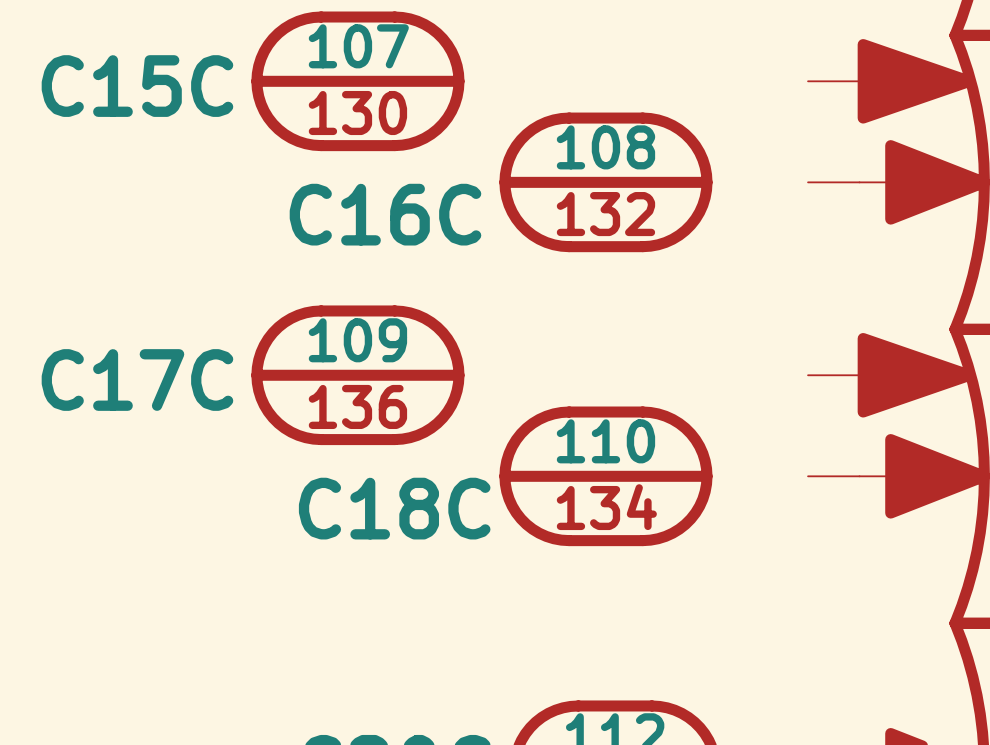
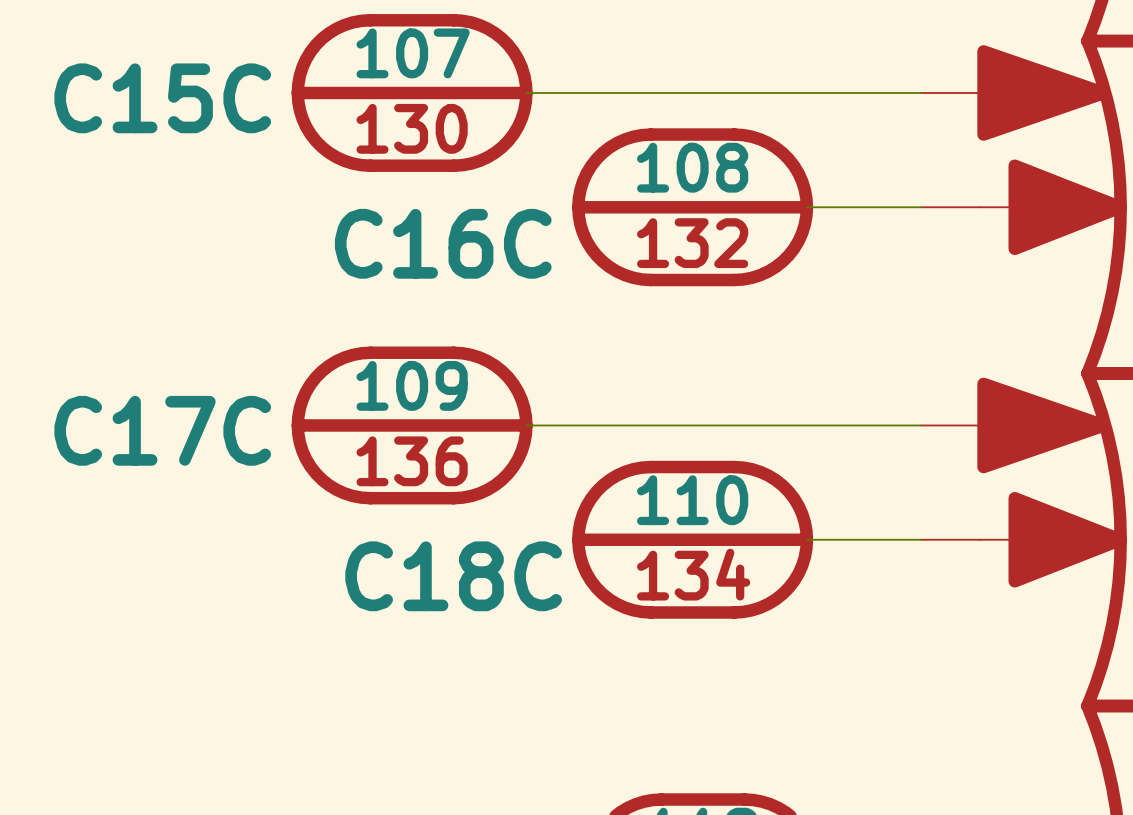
wire: none -> (526, 92) (921, 92)
wire: none -> (806, 207) (921, 207)
wire: none -> (526, 425) (921, 425)
wire: none -> (806, 539) (921, 539)

